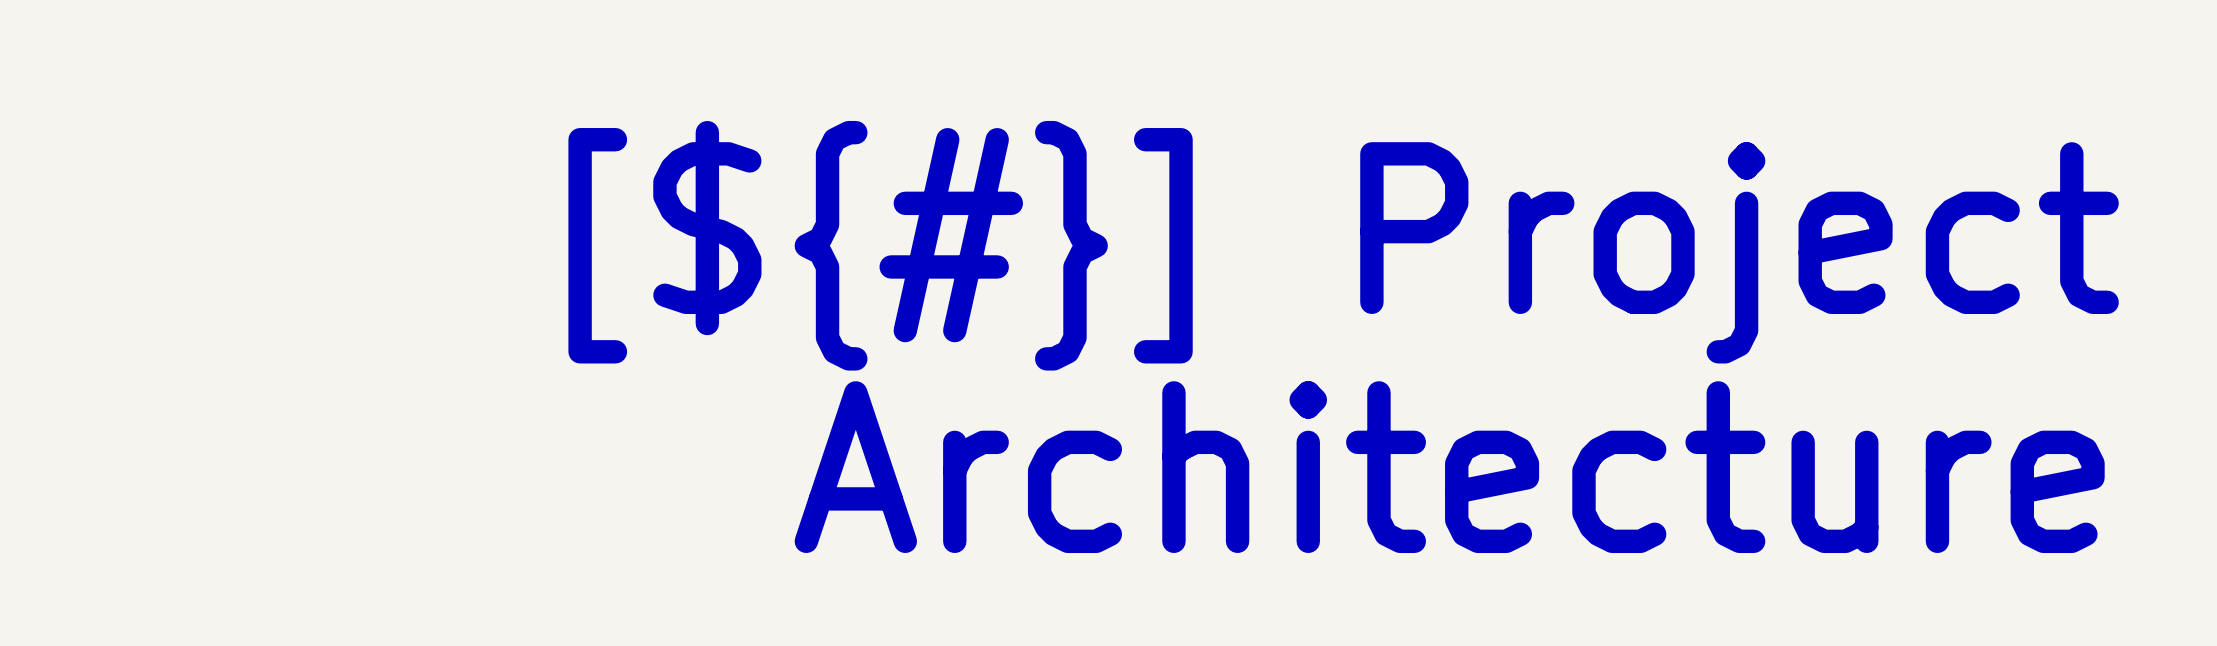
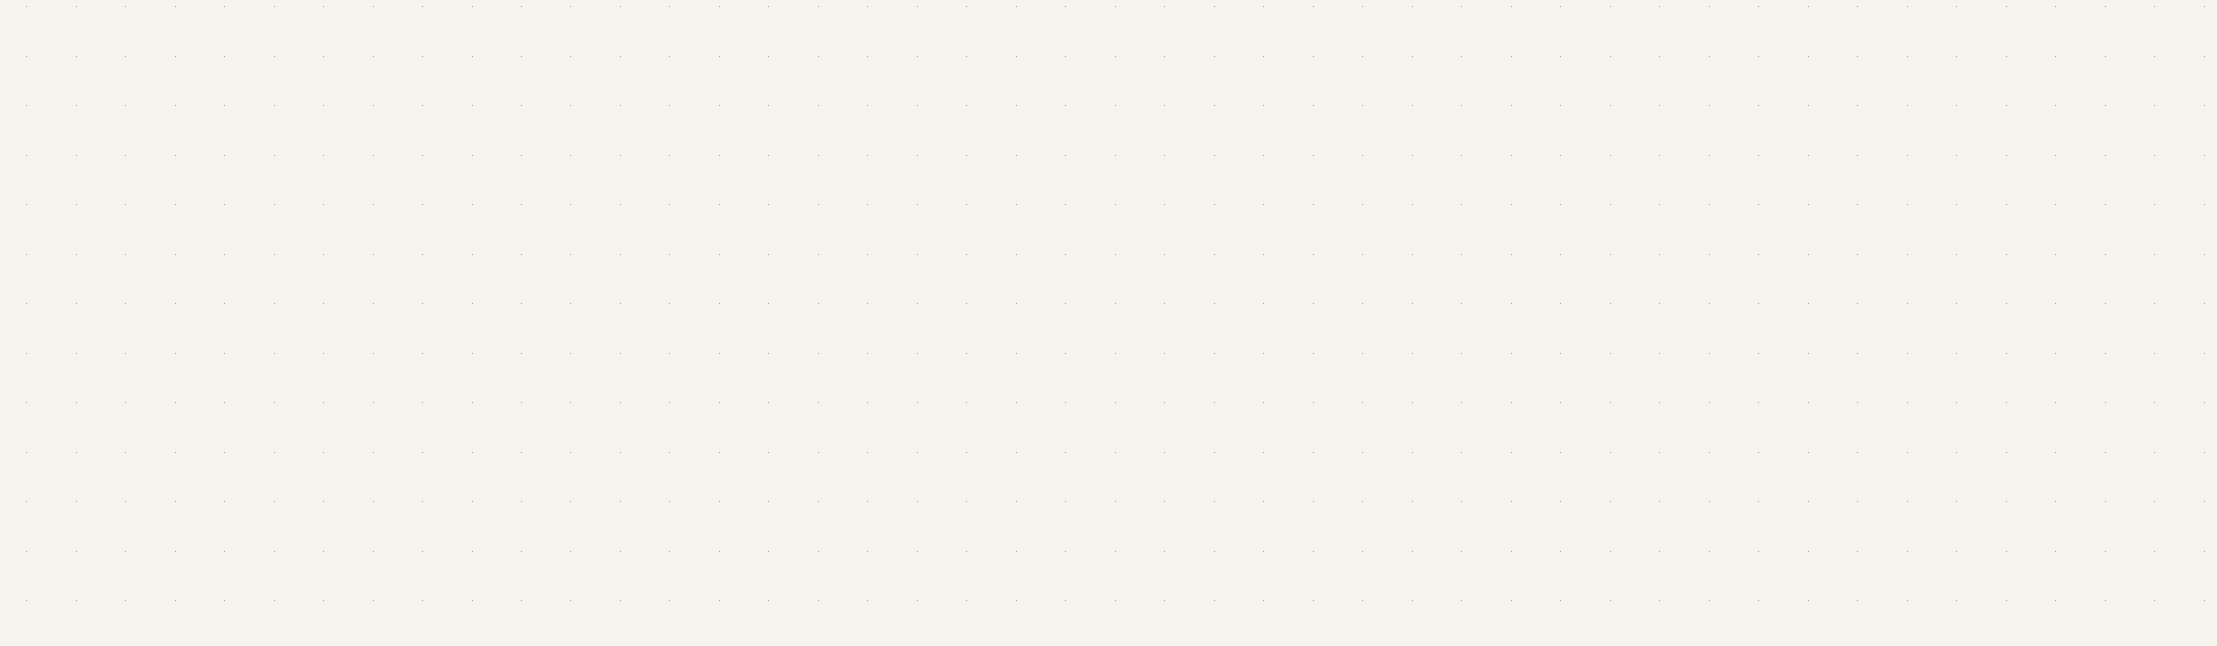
text: [${#}] Project (1343, 245) -> none
text: Architecture (1449, 467) -> none

